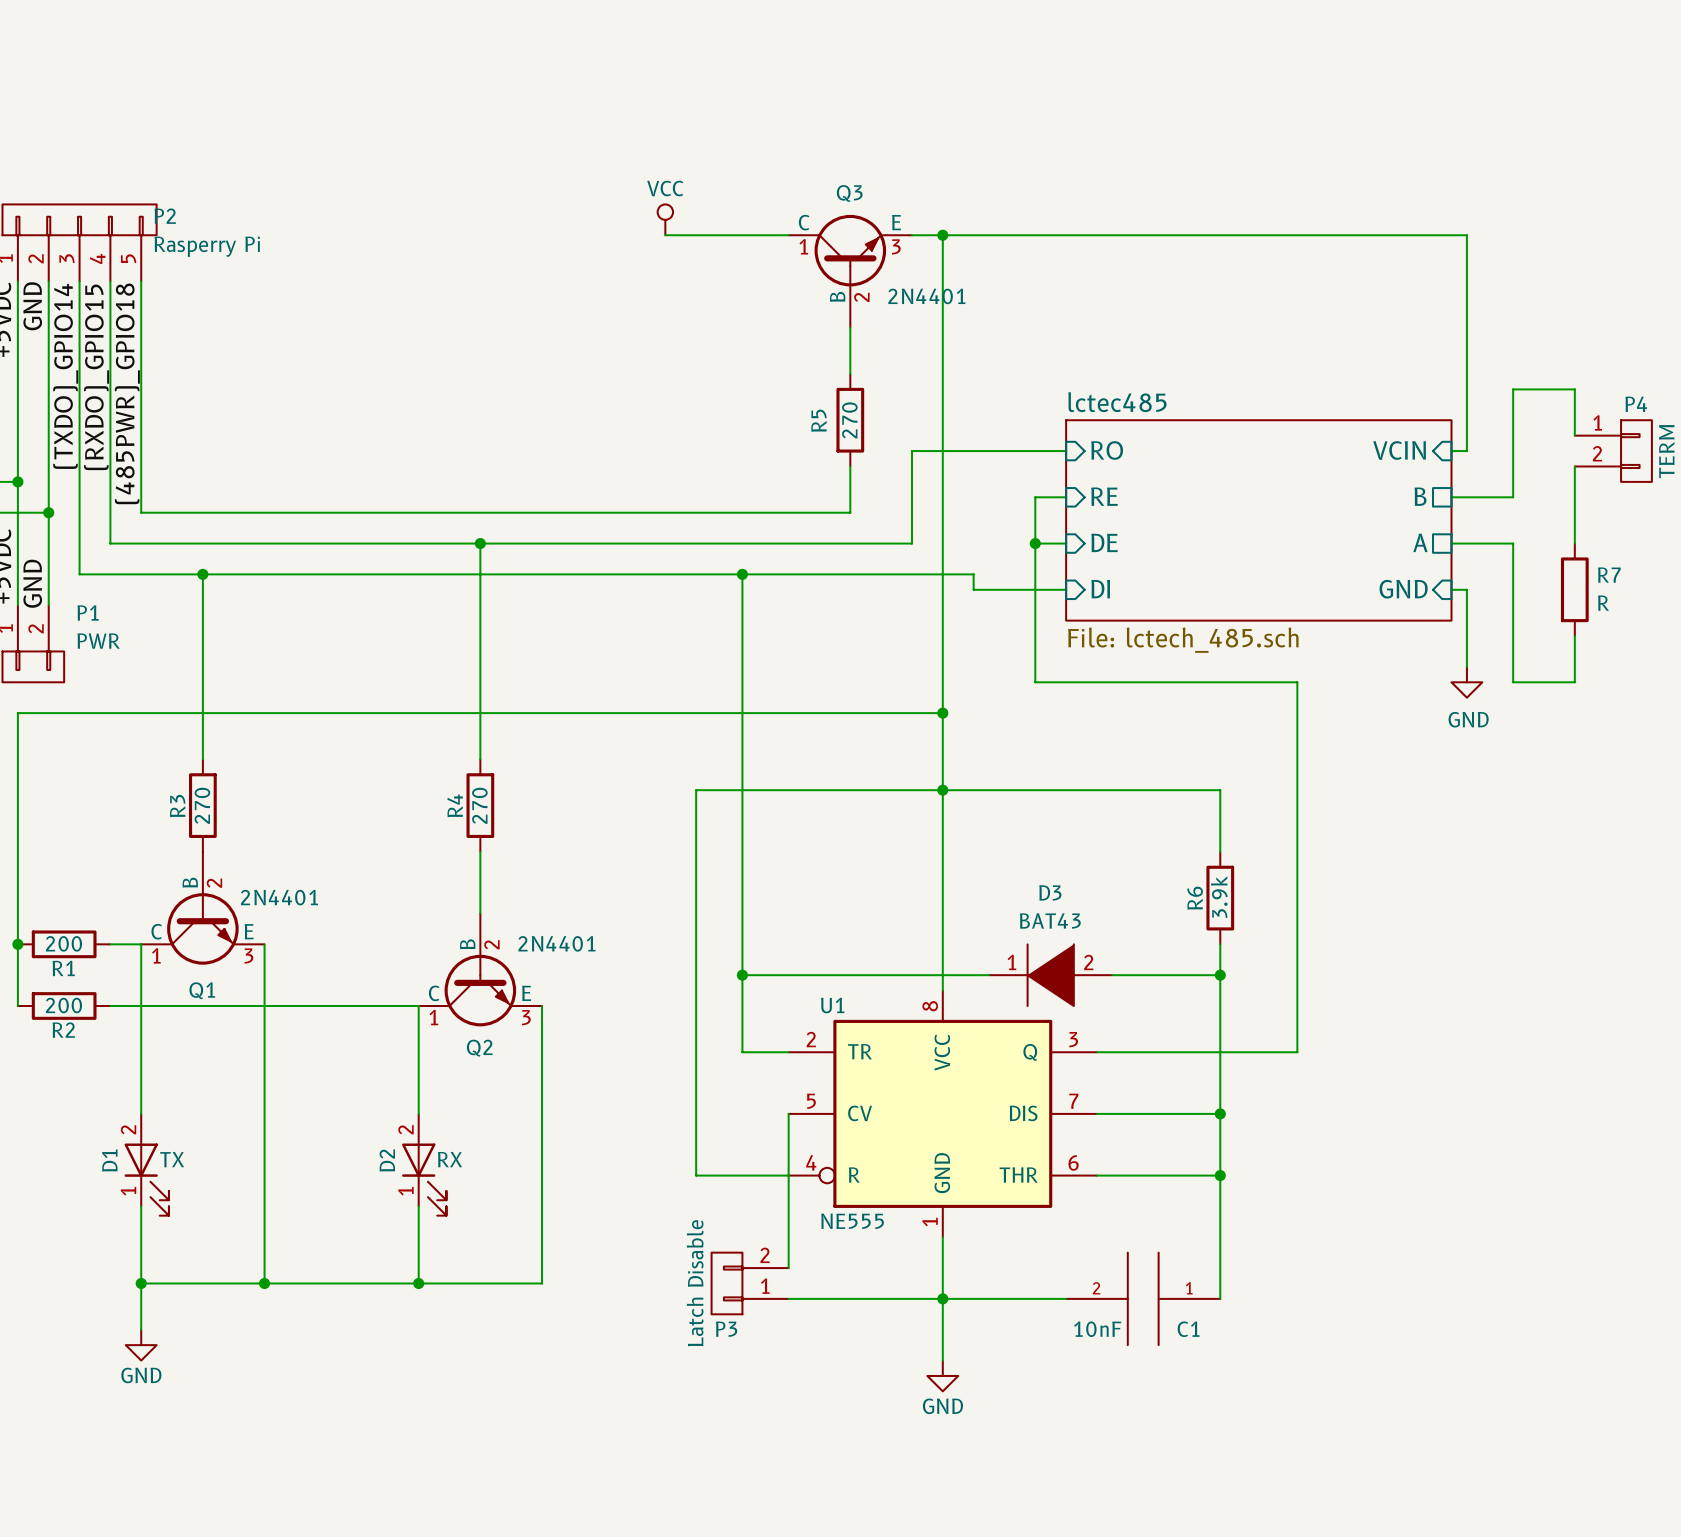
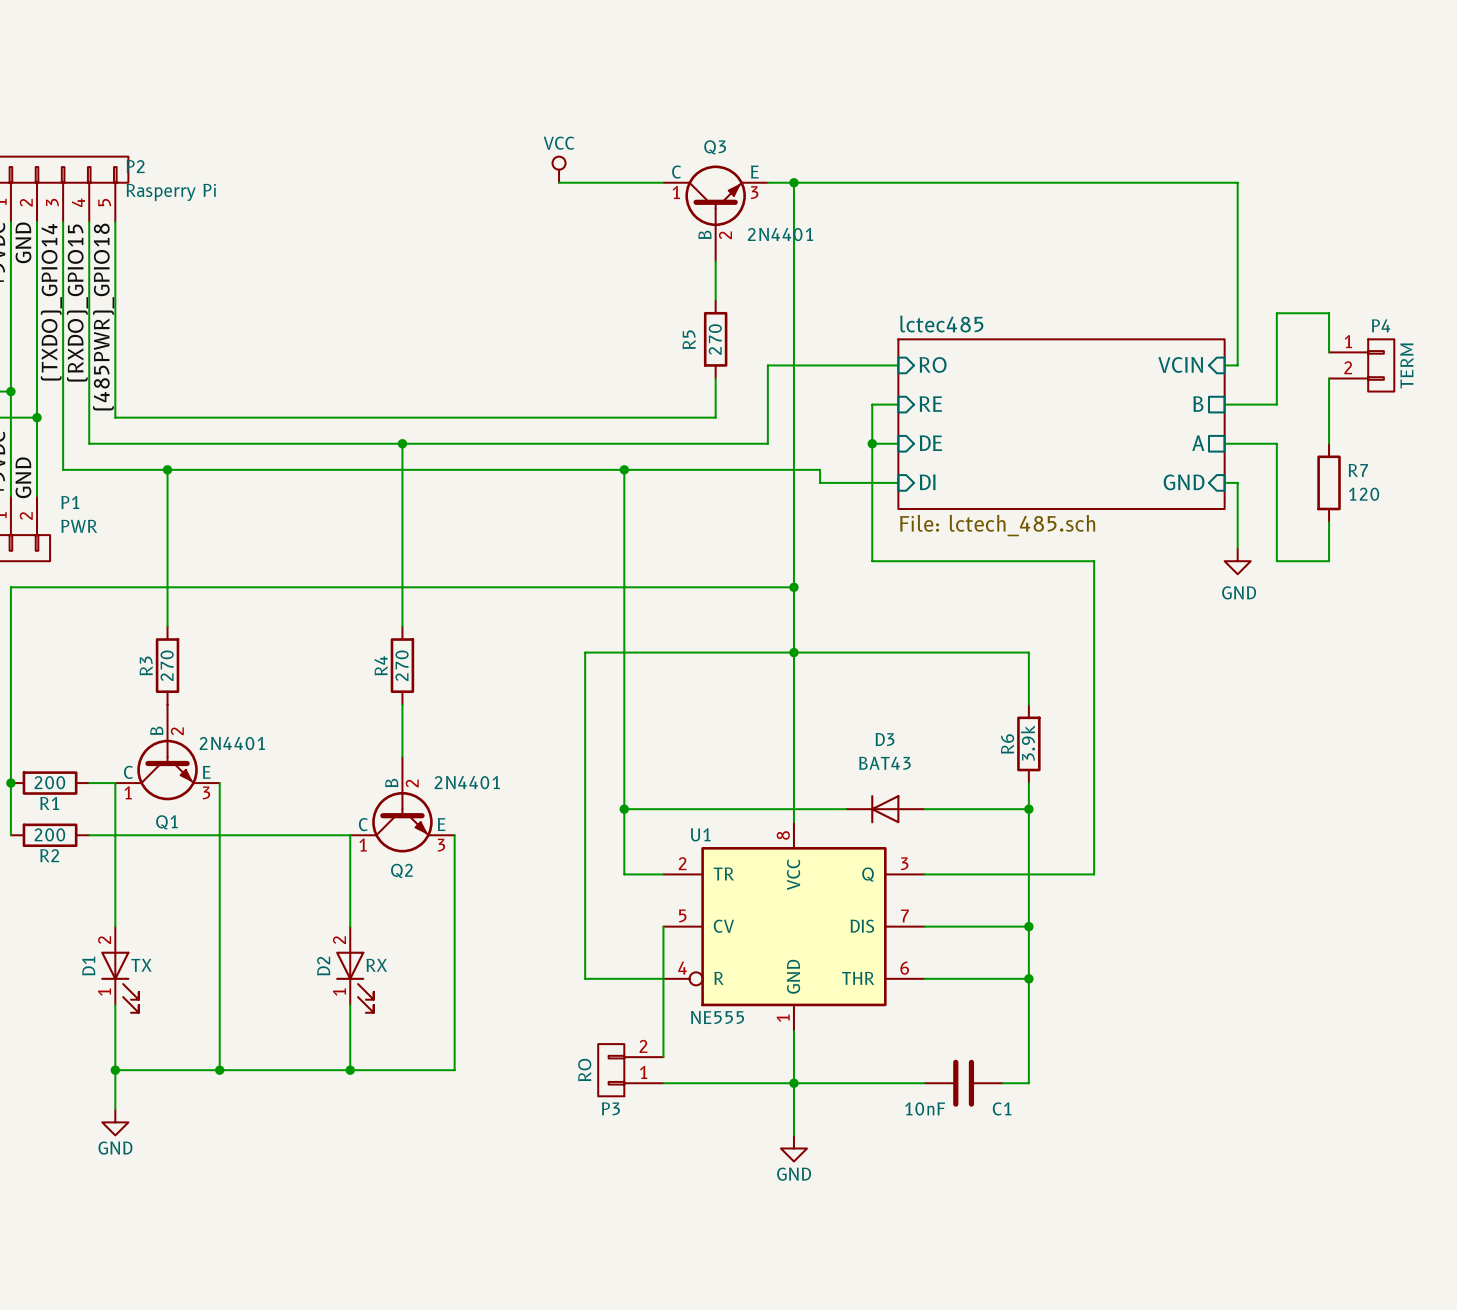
R7 value: R (1603, 603) -> 120 (1364, 494)
D3 symbol: [989, 944, 1113, 1007] -> [846, 795, 925, 824]
C1 symbol: [1066, 1252, 1221, 1346] -> [924, 1059, 1003, 1107]
P3 value: Latch Disable (695, 1283) -> RO (584, 1070)

